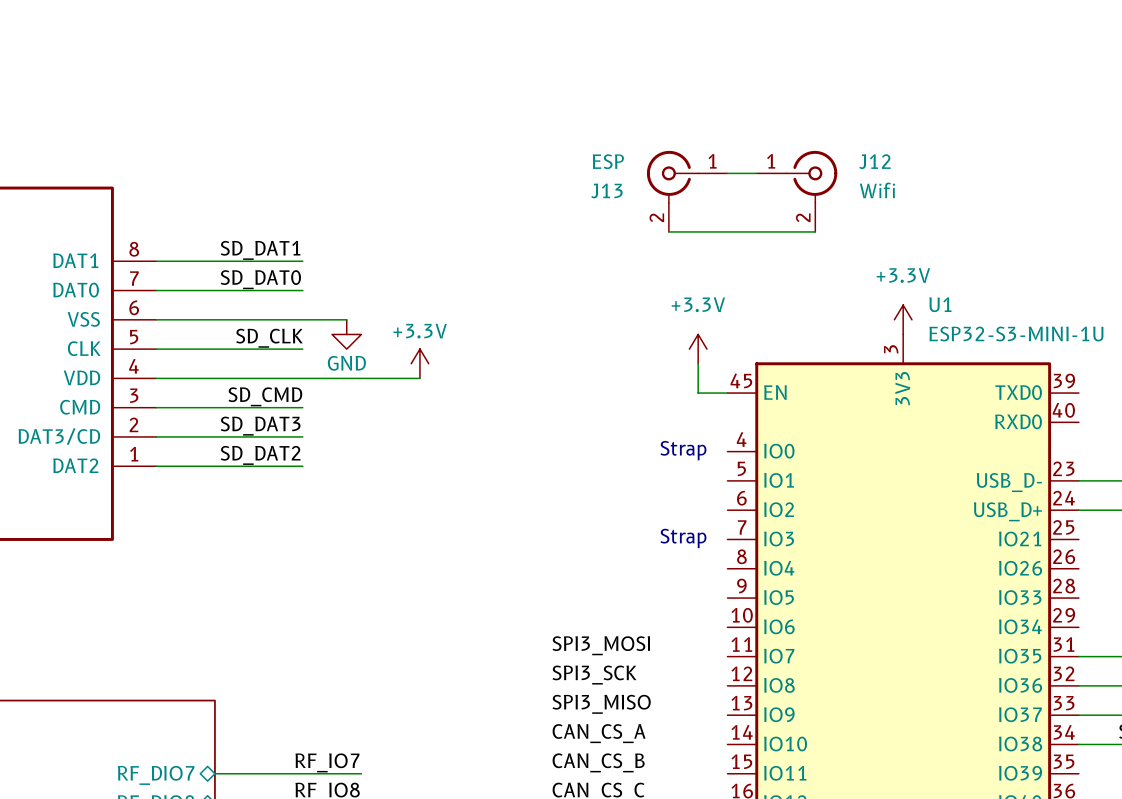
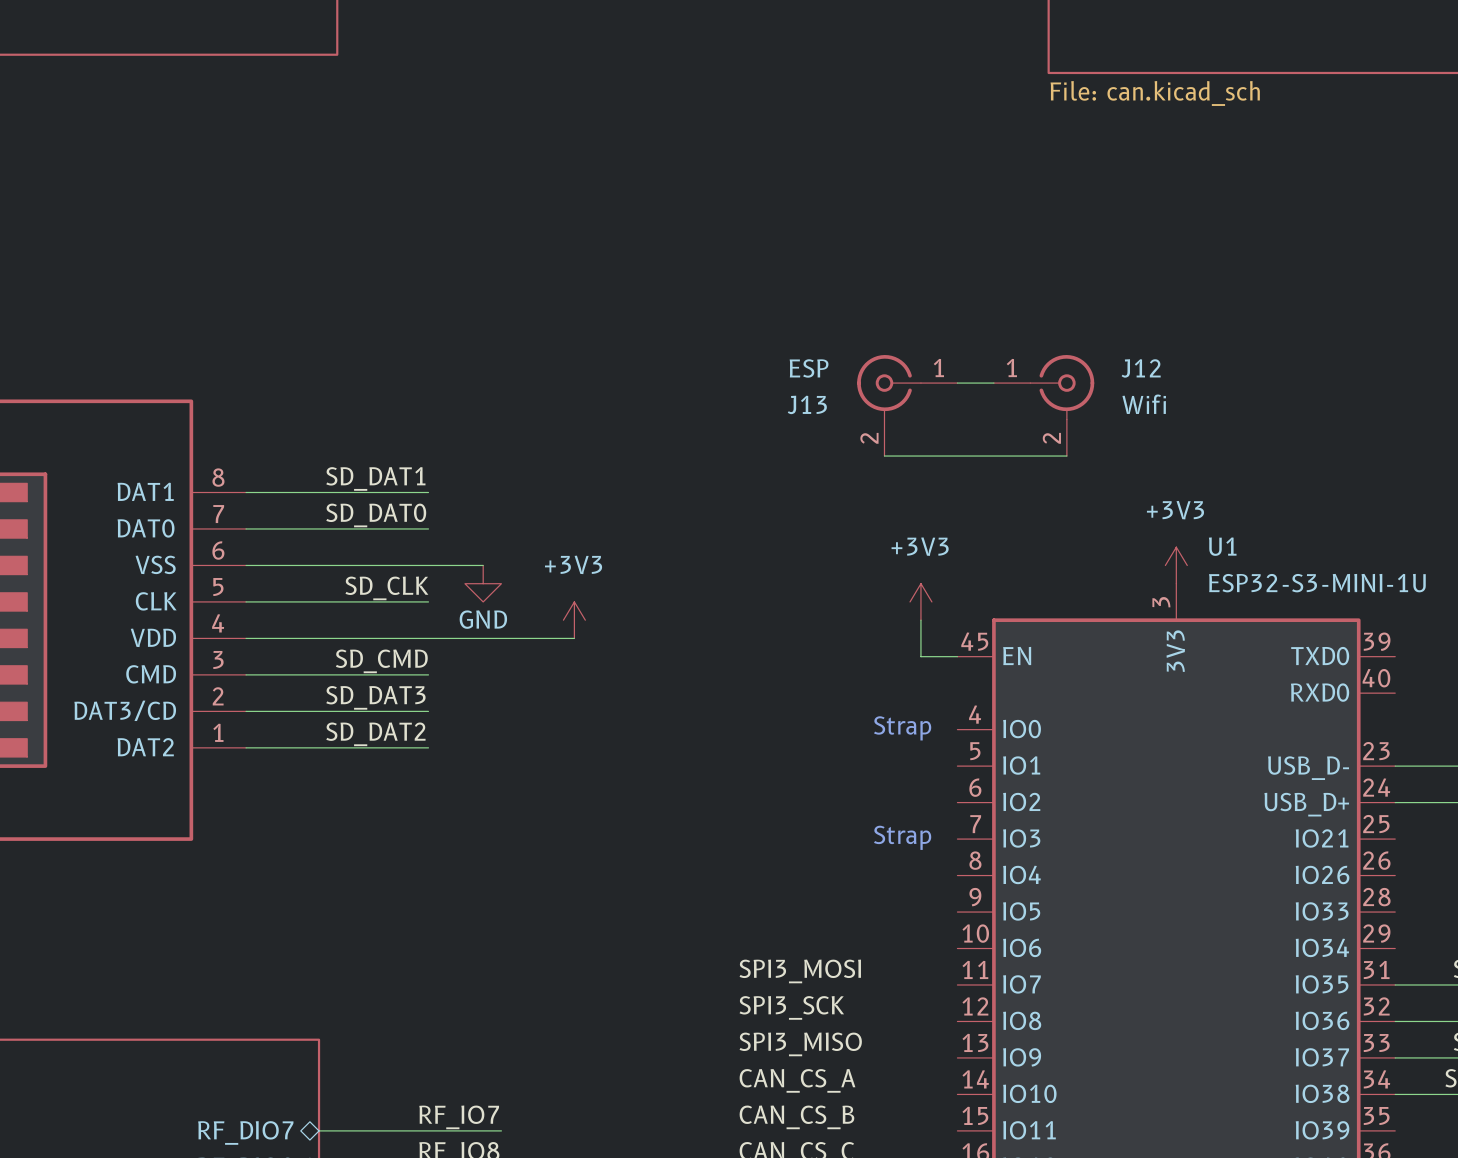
power symbol: +3.3V (903, 319) -> +3V3 (1176, 565)
power symbol: +3.3V (698, 349) -> +3V3 (920, 601)
power symbol: +3.3V (419, 363) -> +3V3 (574, 620)

